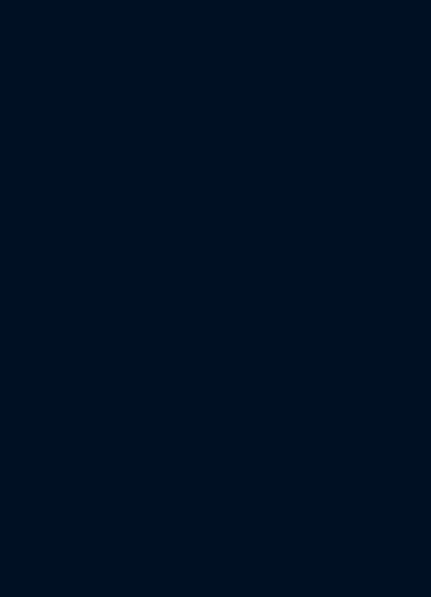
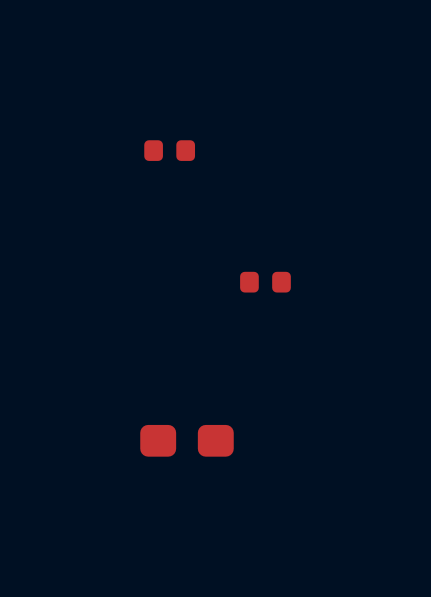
part: none -> (169, 150)
part: none -> (265, 282)
part: none -> (186, 440)

